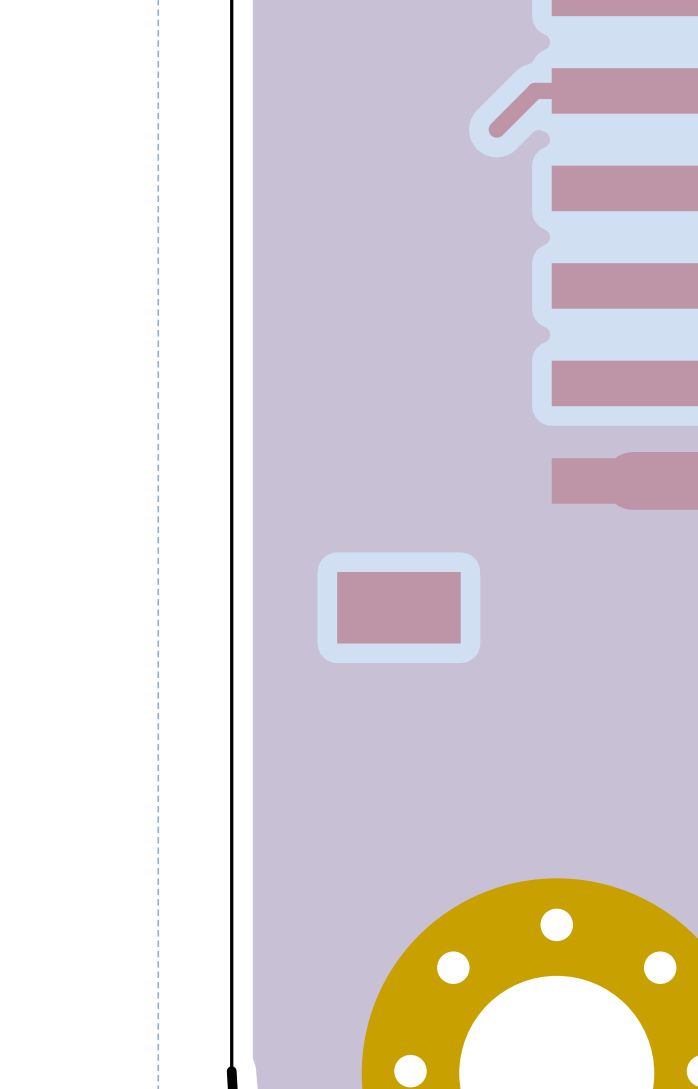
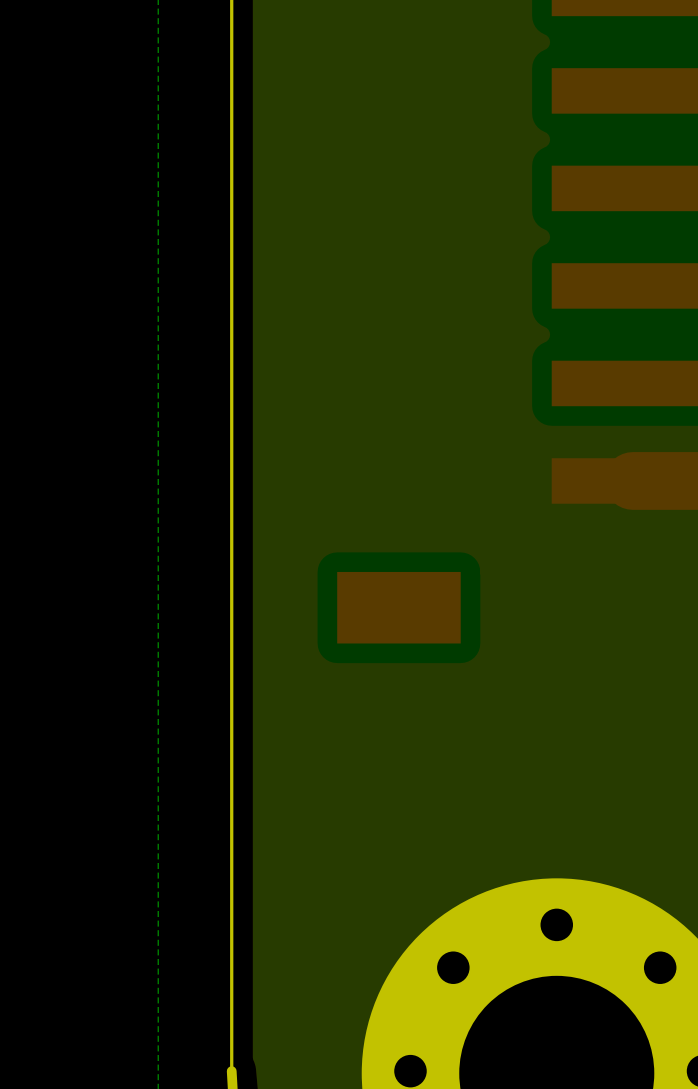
top track: (632, 90) (535, 90) (496, 129) -> none

